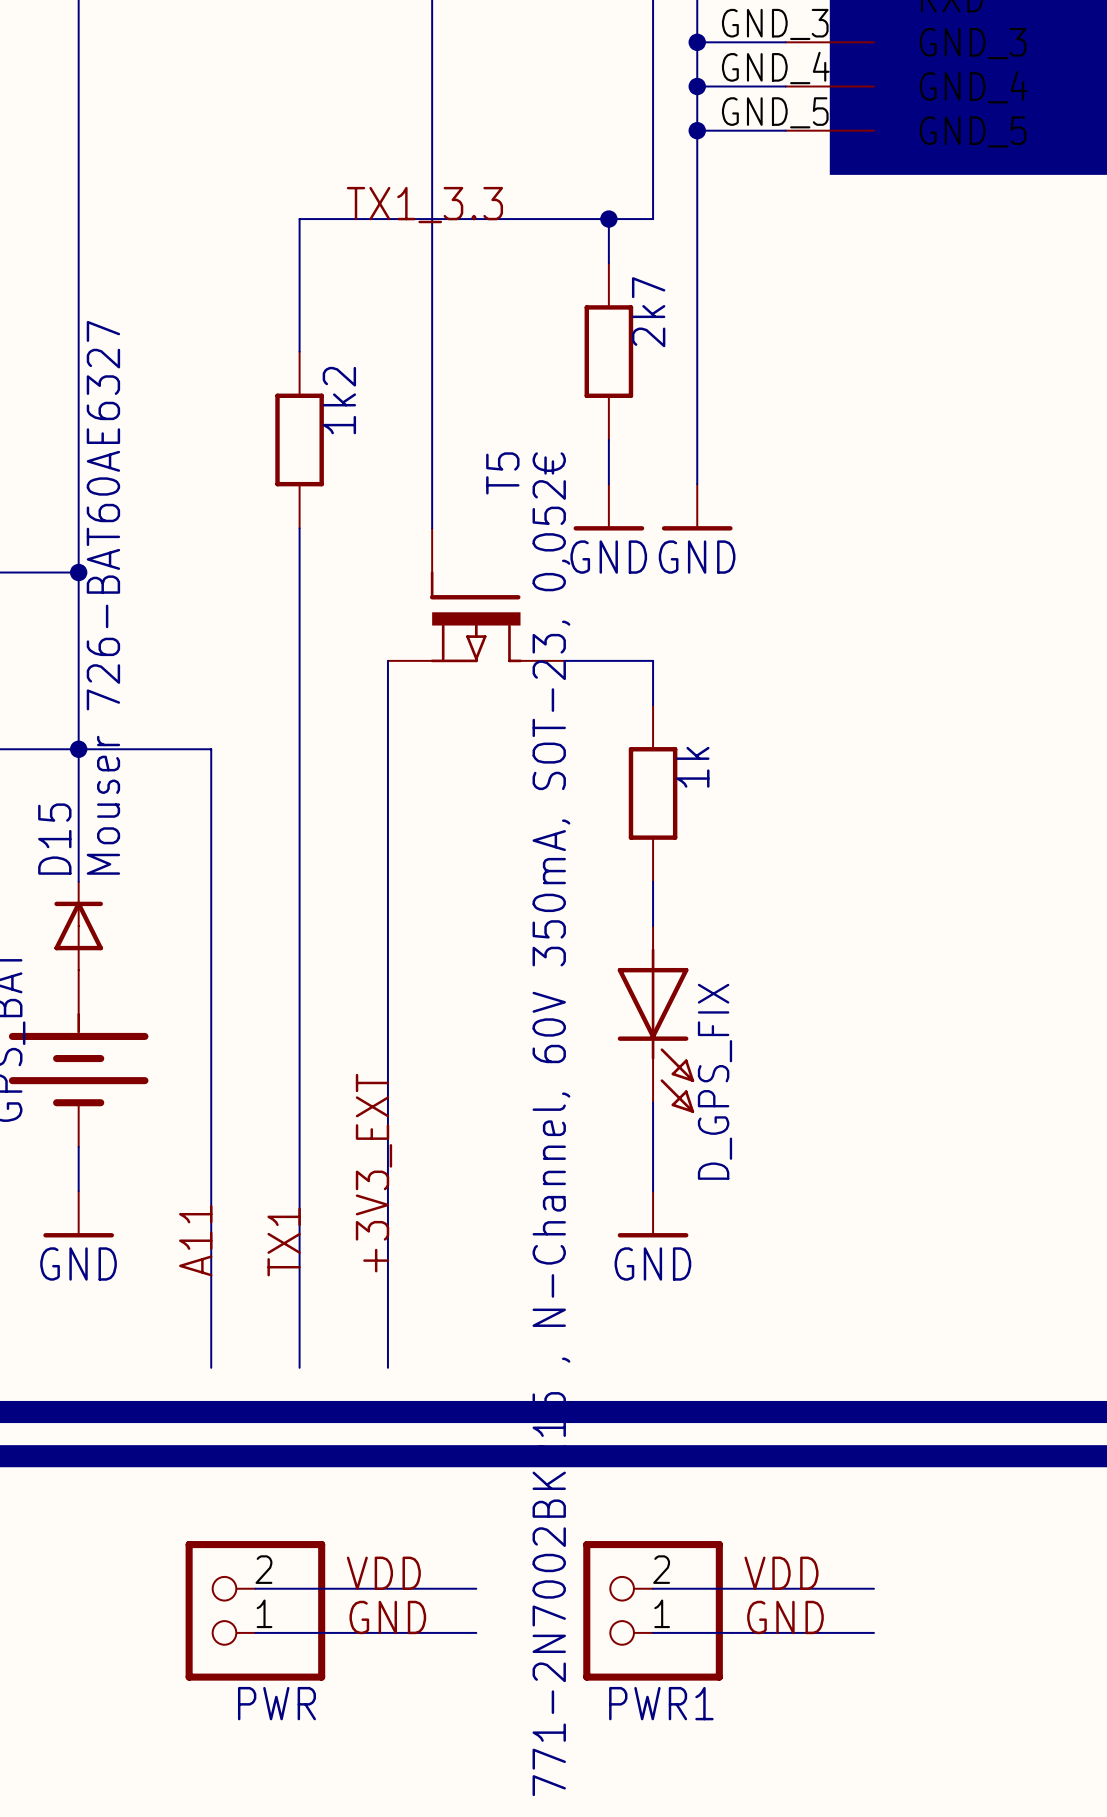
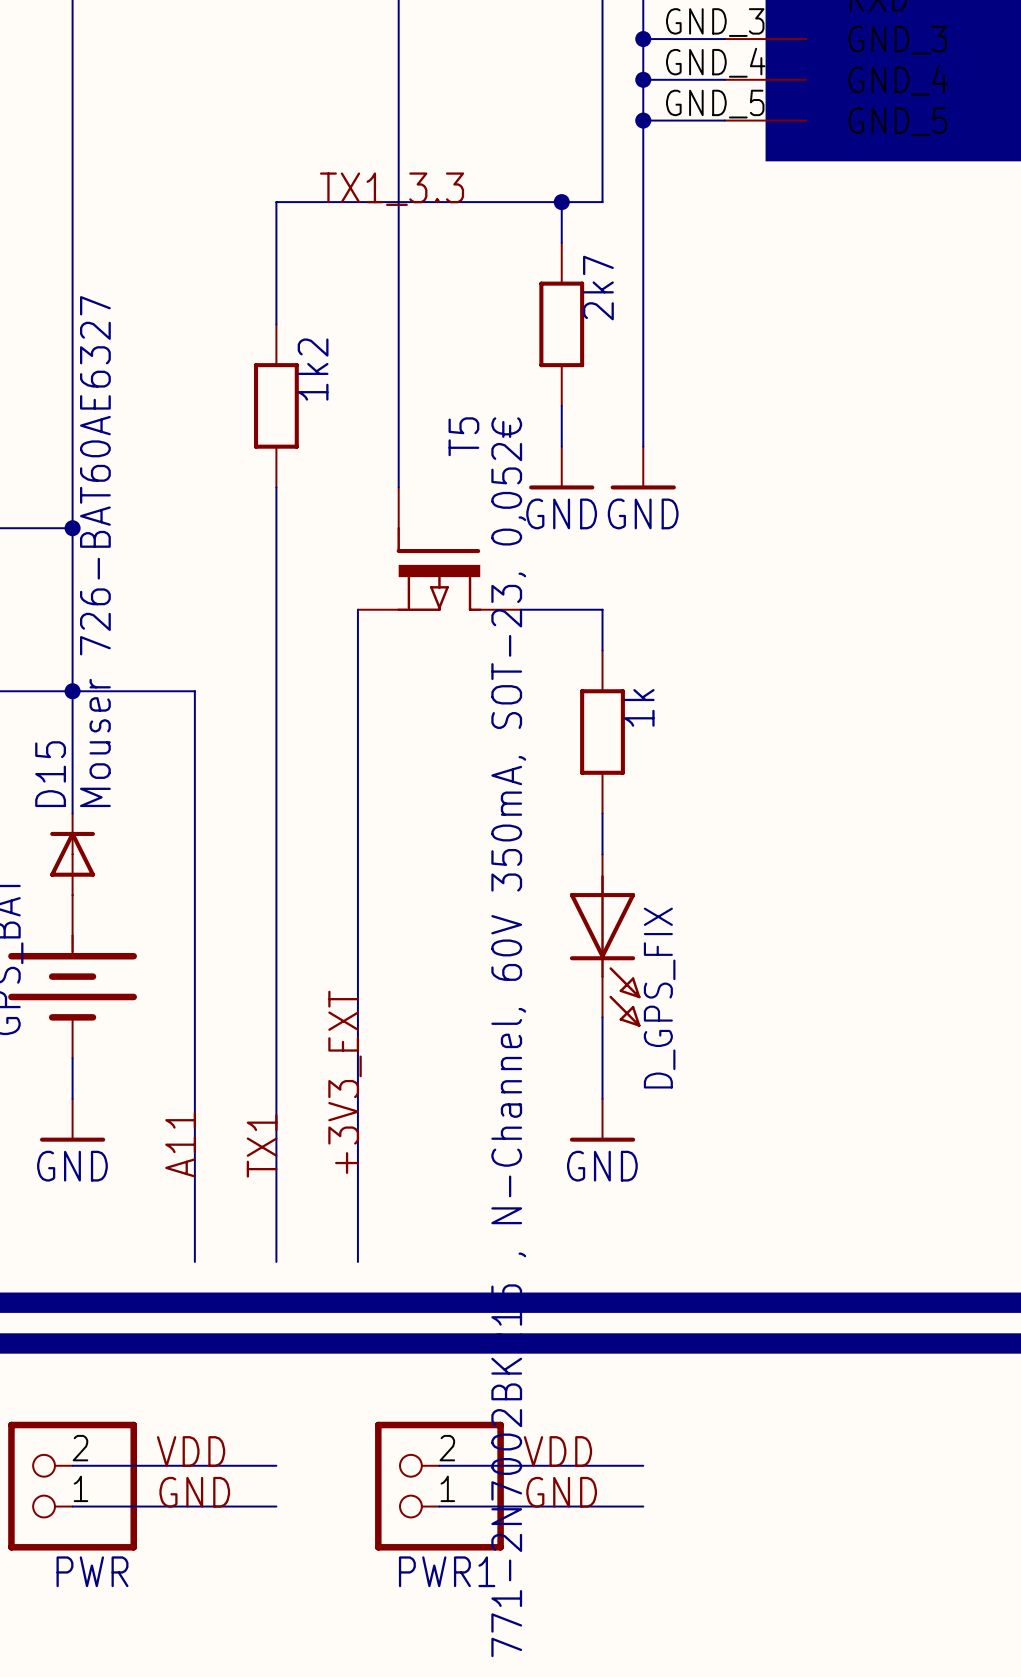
label: none -> VDD (191, 1451)
label: VDD (383, 1573) -> none
label: none -> VDD (557, 1451)
label: VDD (781, 1573) -> none
wire: none -> (72, 1465) (235, 1465)
wire: (299, 1588) (476, 1588) -> (602, 1465) (439, 1465)
wire: (697, 1588) (873, 1588) -> none
PWR position: (255, 1610) -> (72, 1486)
PWR1 position: (653, 1610) -> (439, 1486)
label: none -> GND (194, 1492)
label: GND (387, 1617) -> none
label: none -> GND (561, 1492)
label: GND (785, 1617) -> none
wire: none -> (72, 1506) (235, 1506)
wire: (299, 1632) (476, 1632) -> (602, 1506) (439, 1506)
wire: (697, 1632) (873, 1632) -> none

